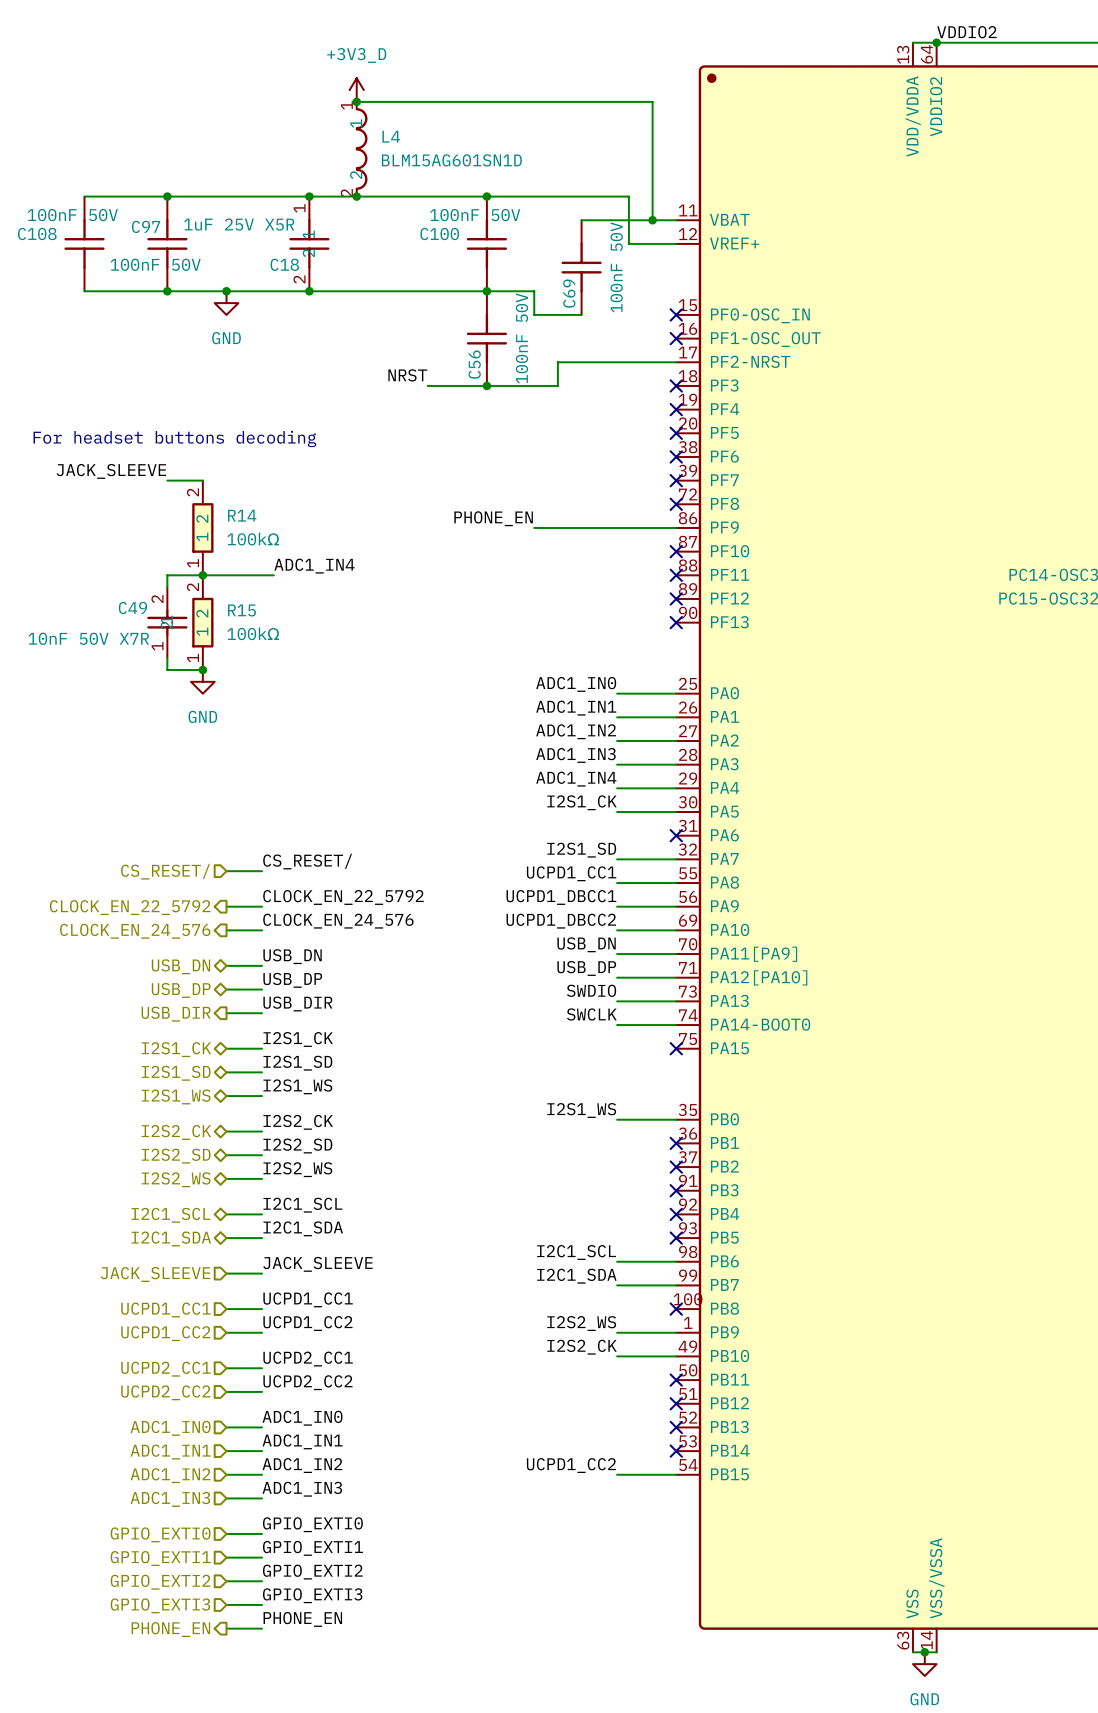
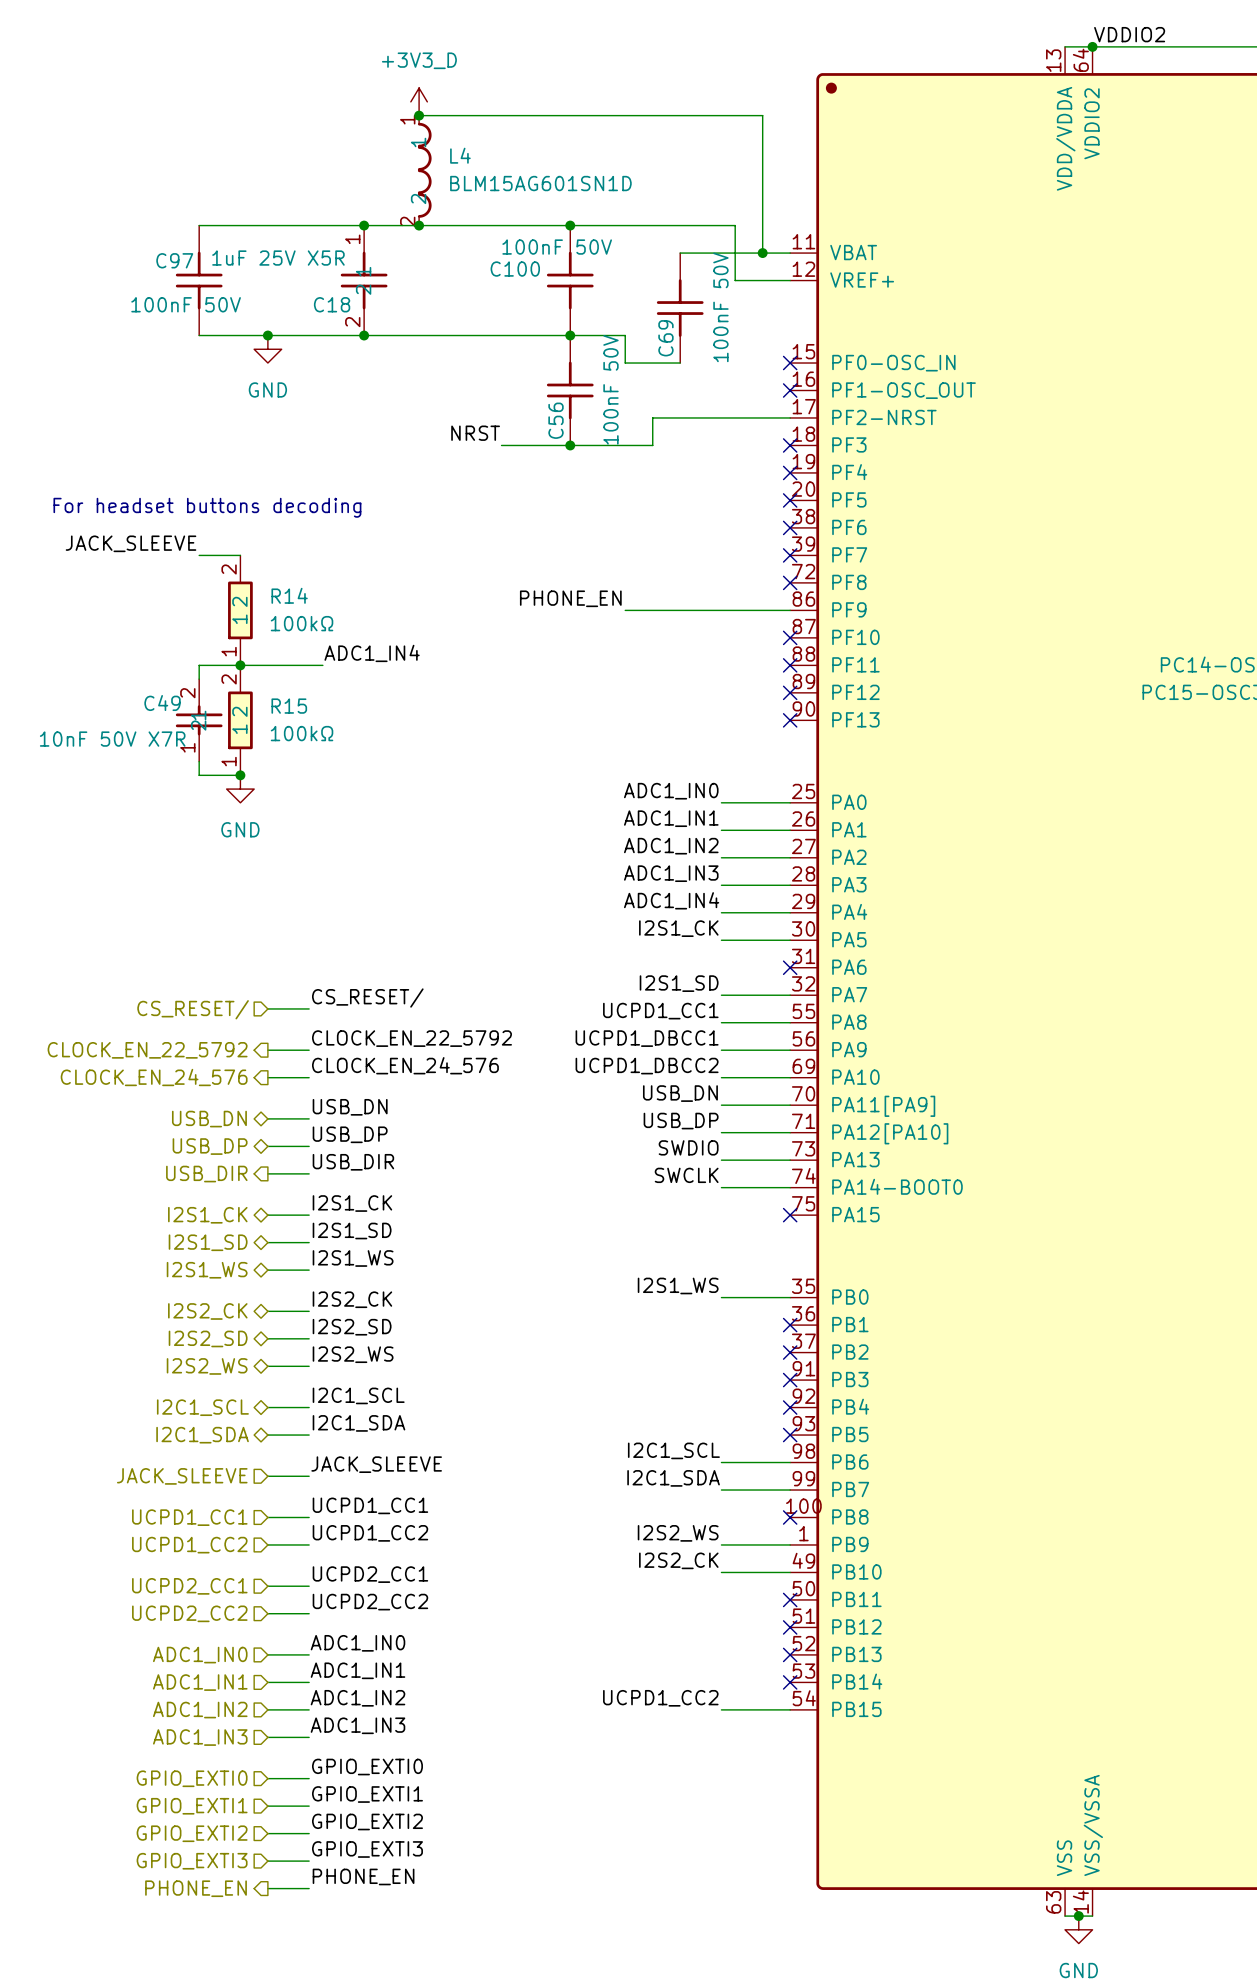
wire: (84, 196) (167, 196) -> none
junction: (167, 196) -> none
C108: 100nF 50V (84, 243) -> none
wire: (84, 291) (167, 291) -> none
junction: (167, 291) -> none

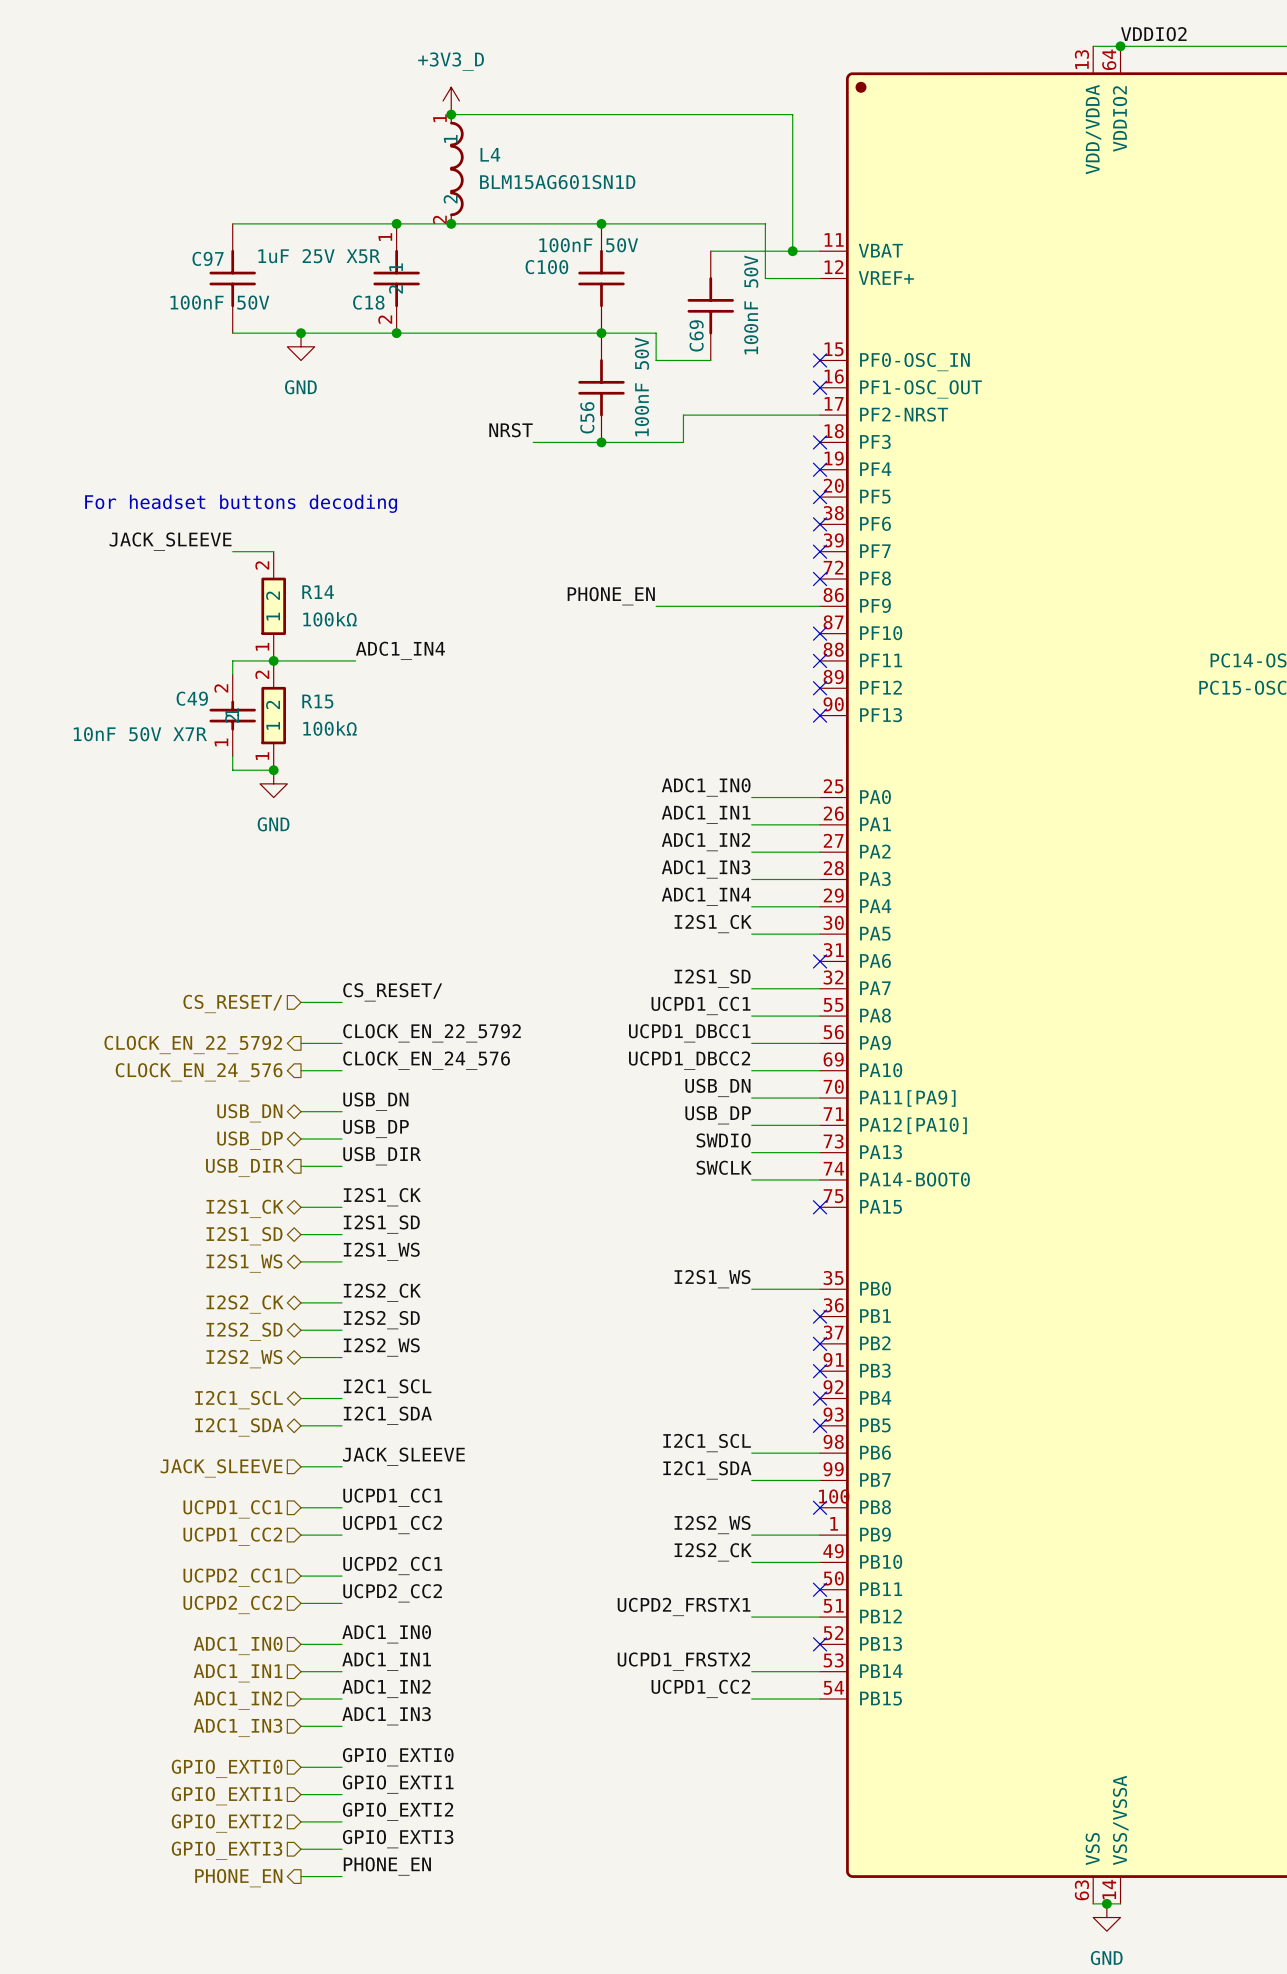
label: none -> UCPD2_FRSTX1 (684, 1606)
wire: none -> (751, 1617) (820, 1617)
no-connect mark: (790, 1627) -> none
label: none -> UCPD1_FRSTX2 (683, 1661)
wire: none -> (751, 1671) (820, 1671)
no-connect mark: (790, 1682) -> none

